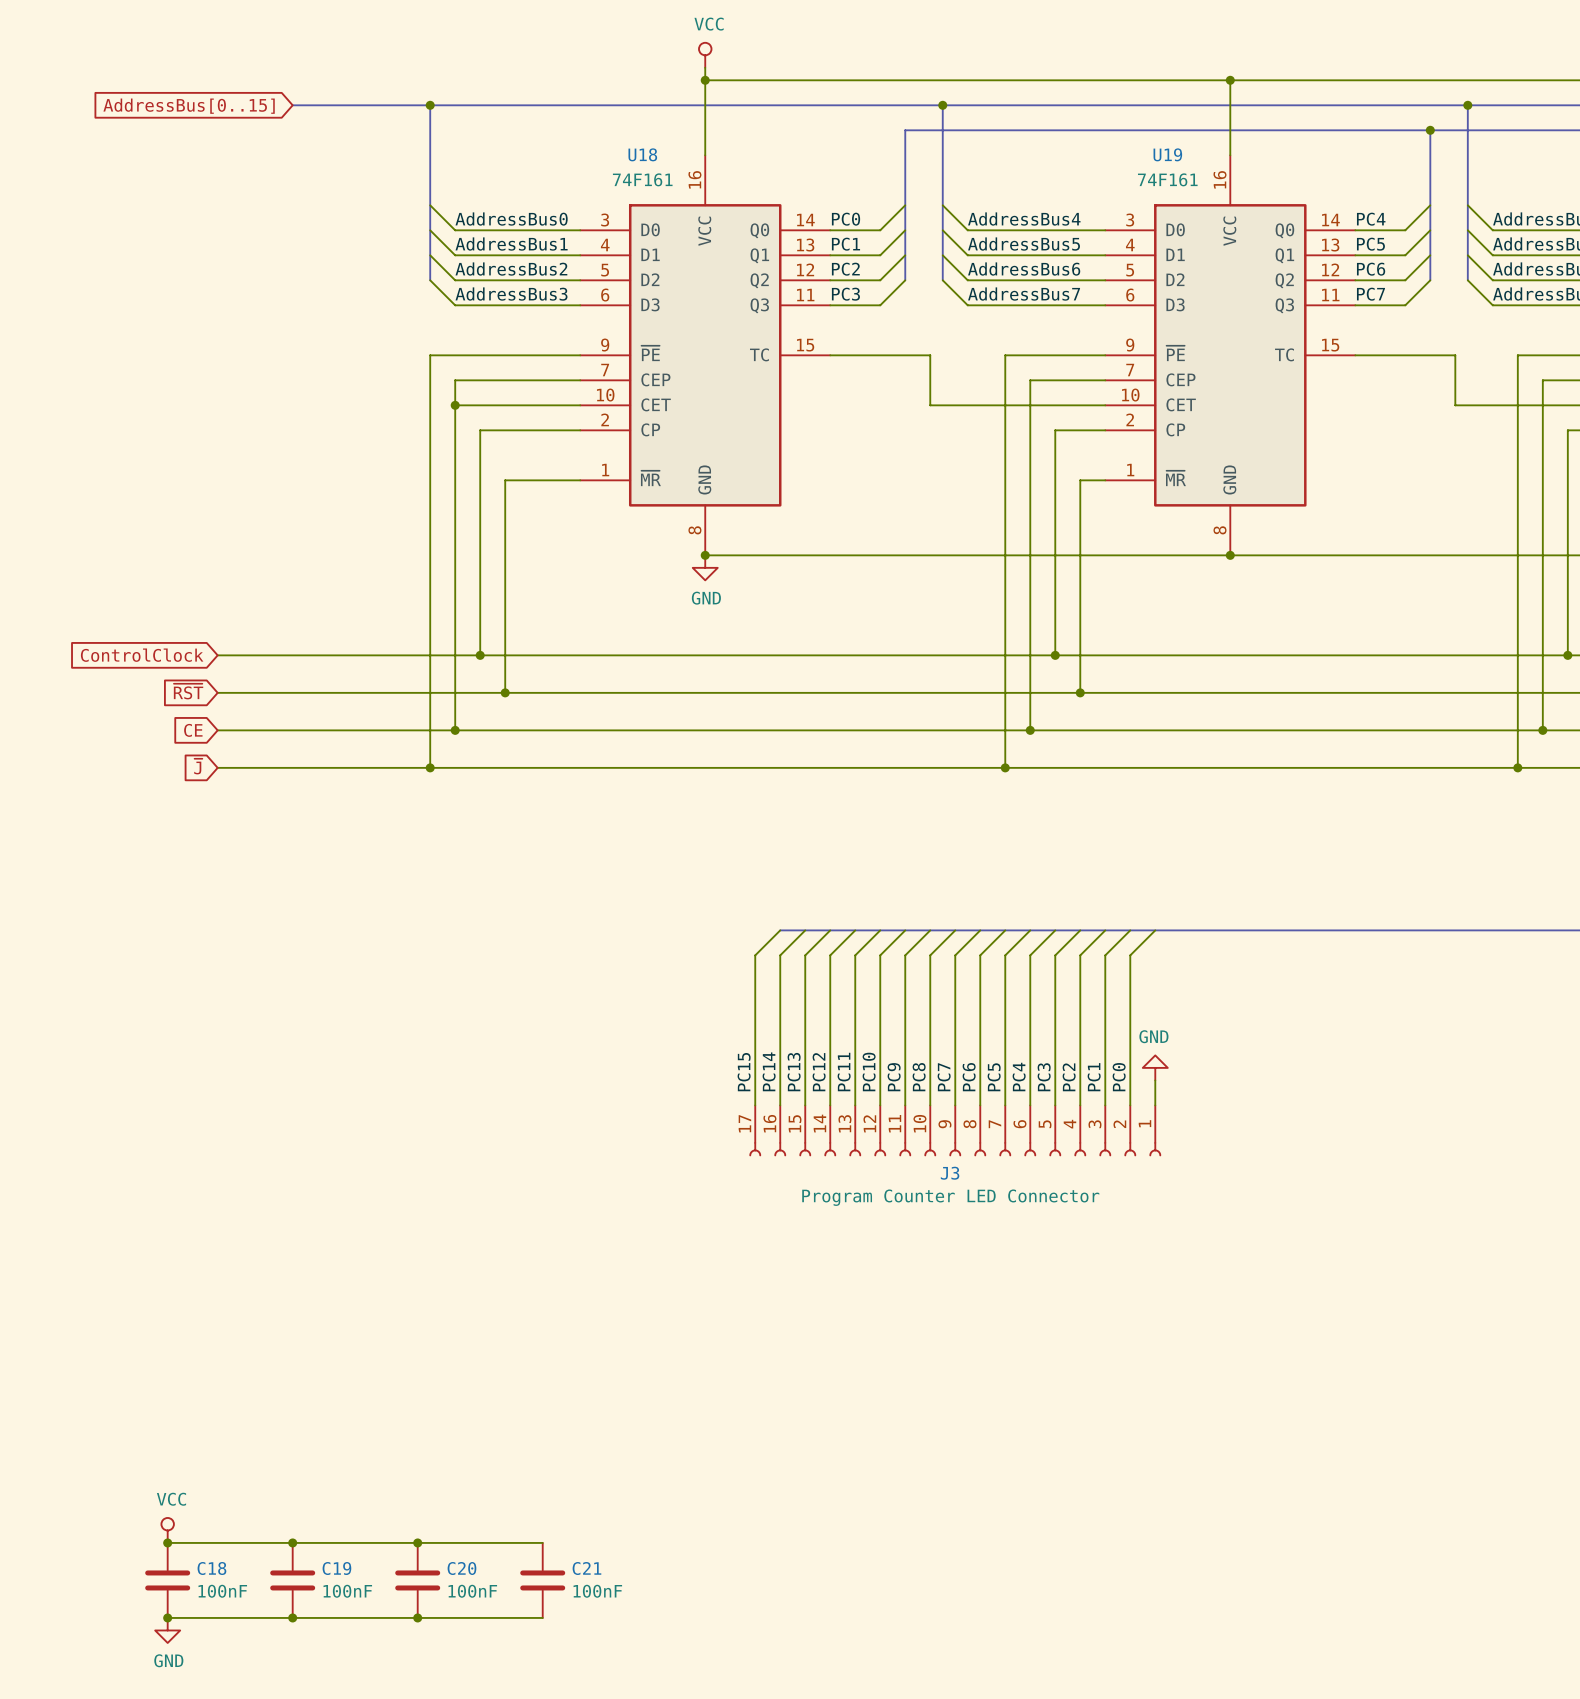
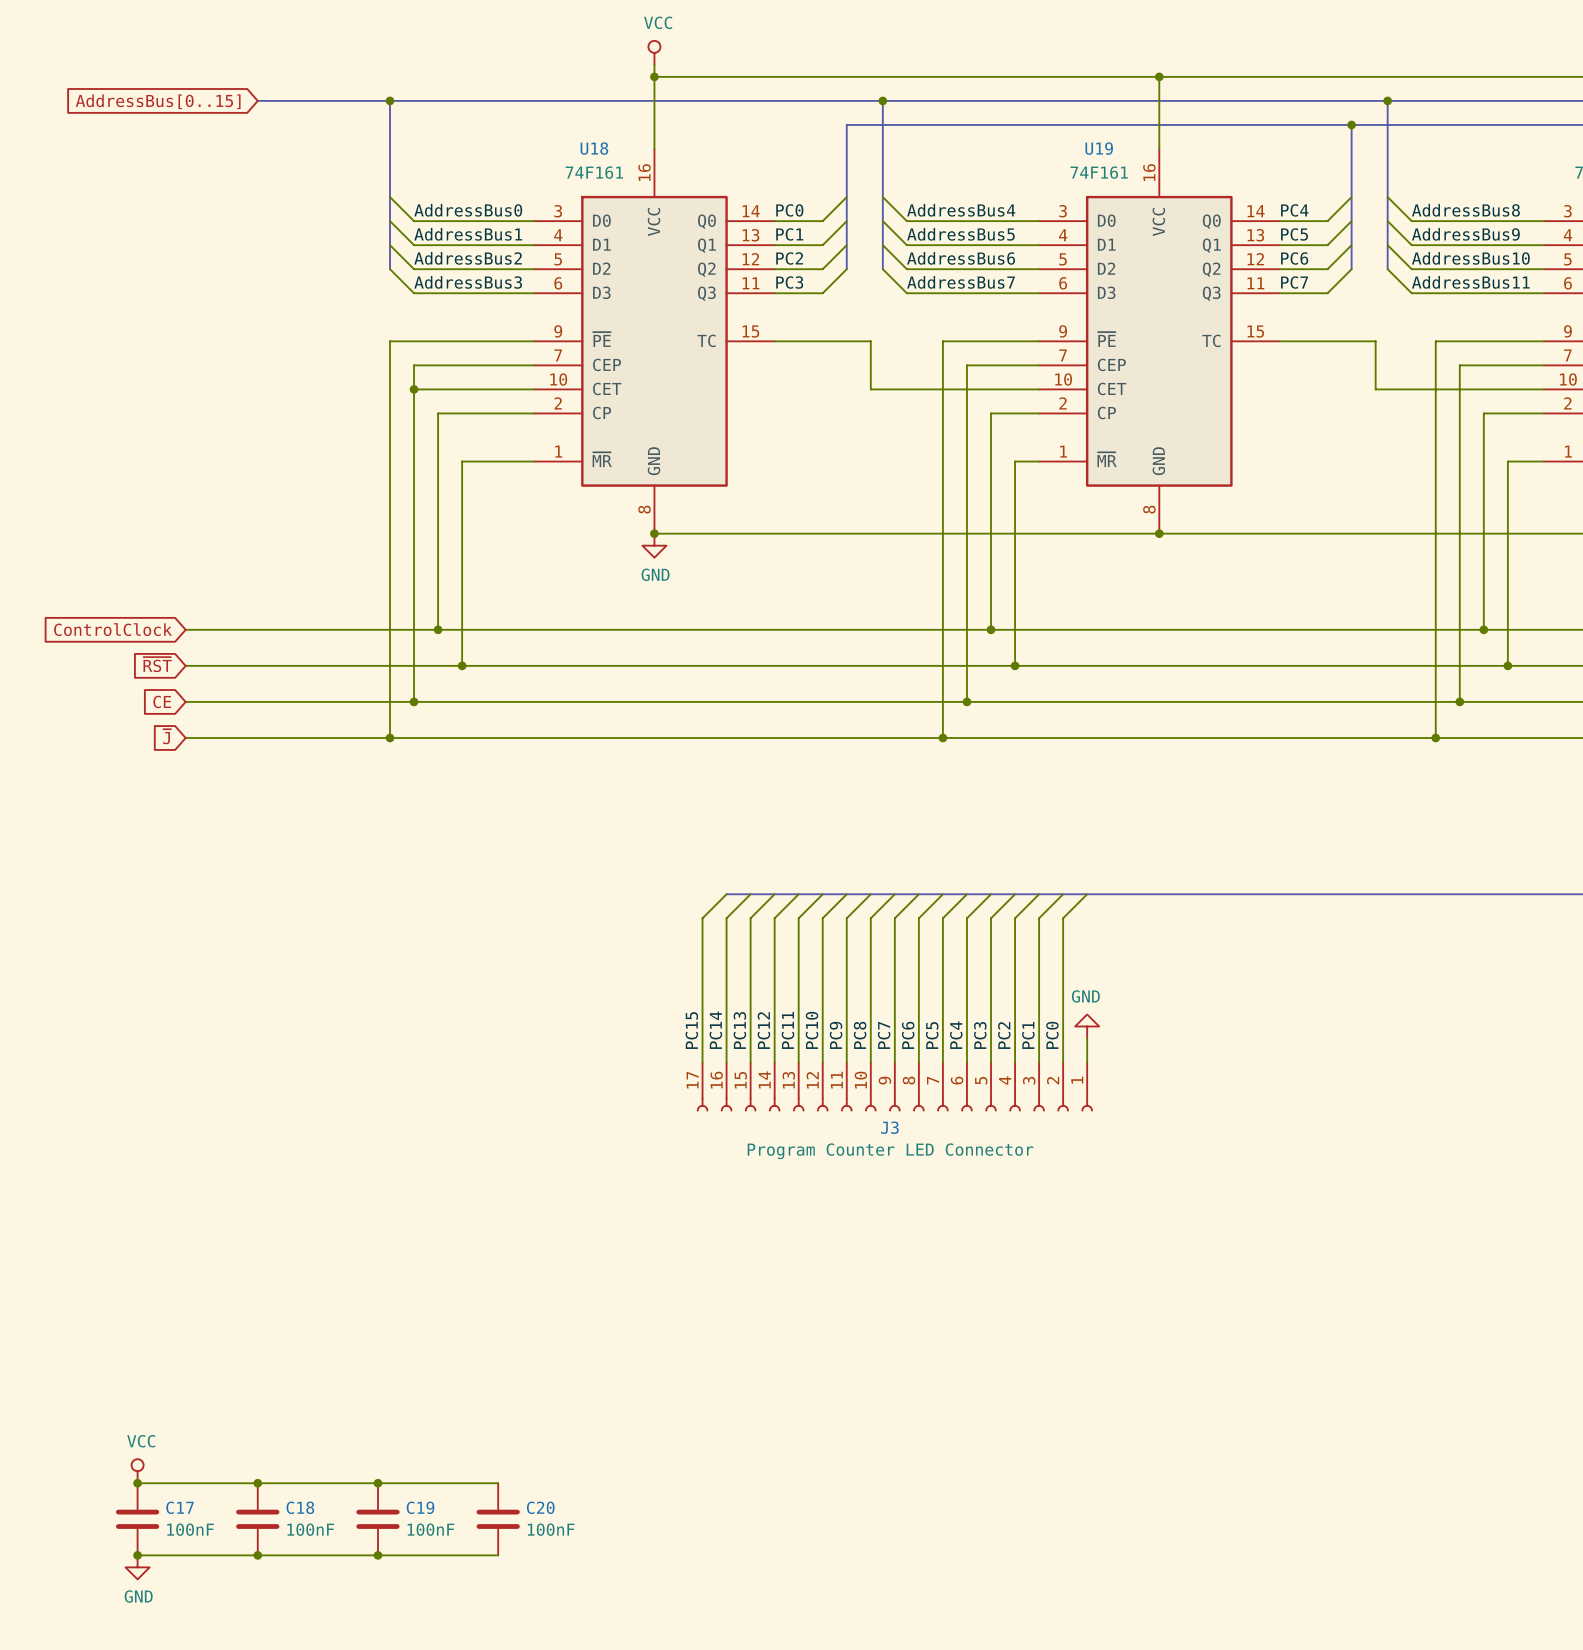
C18 name: C18 (211, 1568) -> C17 (180, 1507)
C19 name: C19 (336, 1568) -> C18 (300, 1507)
C20 name: C20 (461, 1568) -> C19 (420, 1507)
C21 name: C21 (586, 1568) -> C20 (540, 1507)

